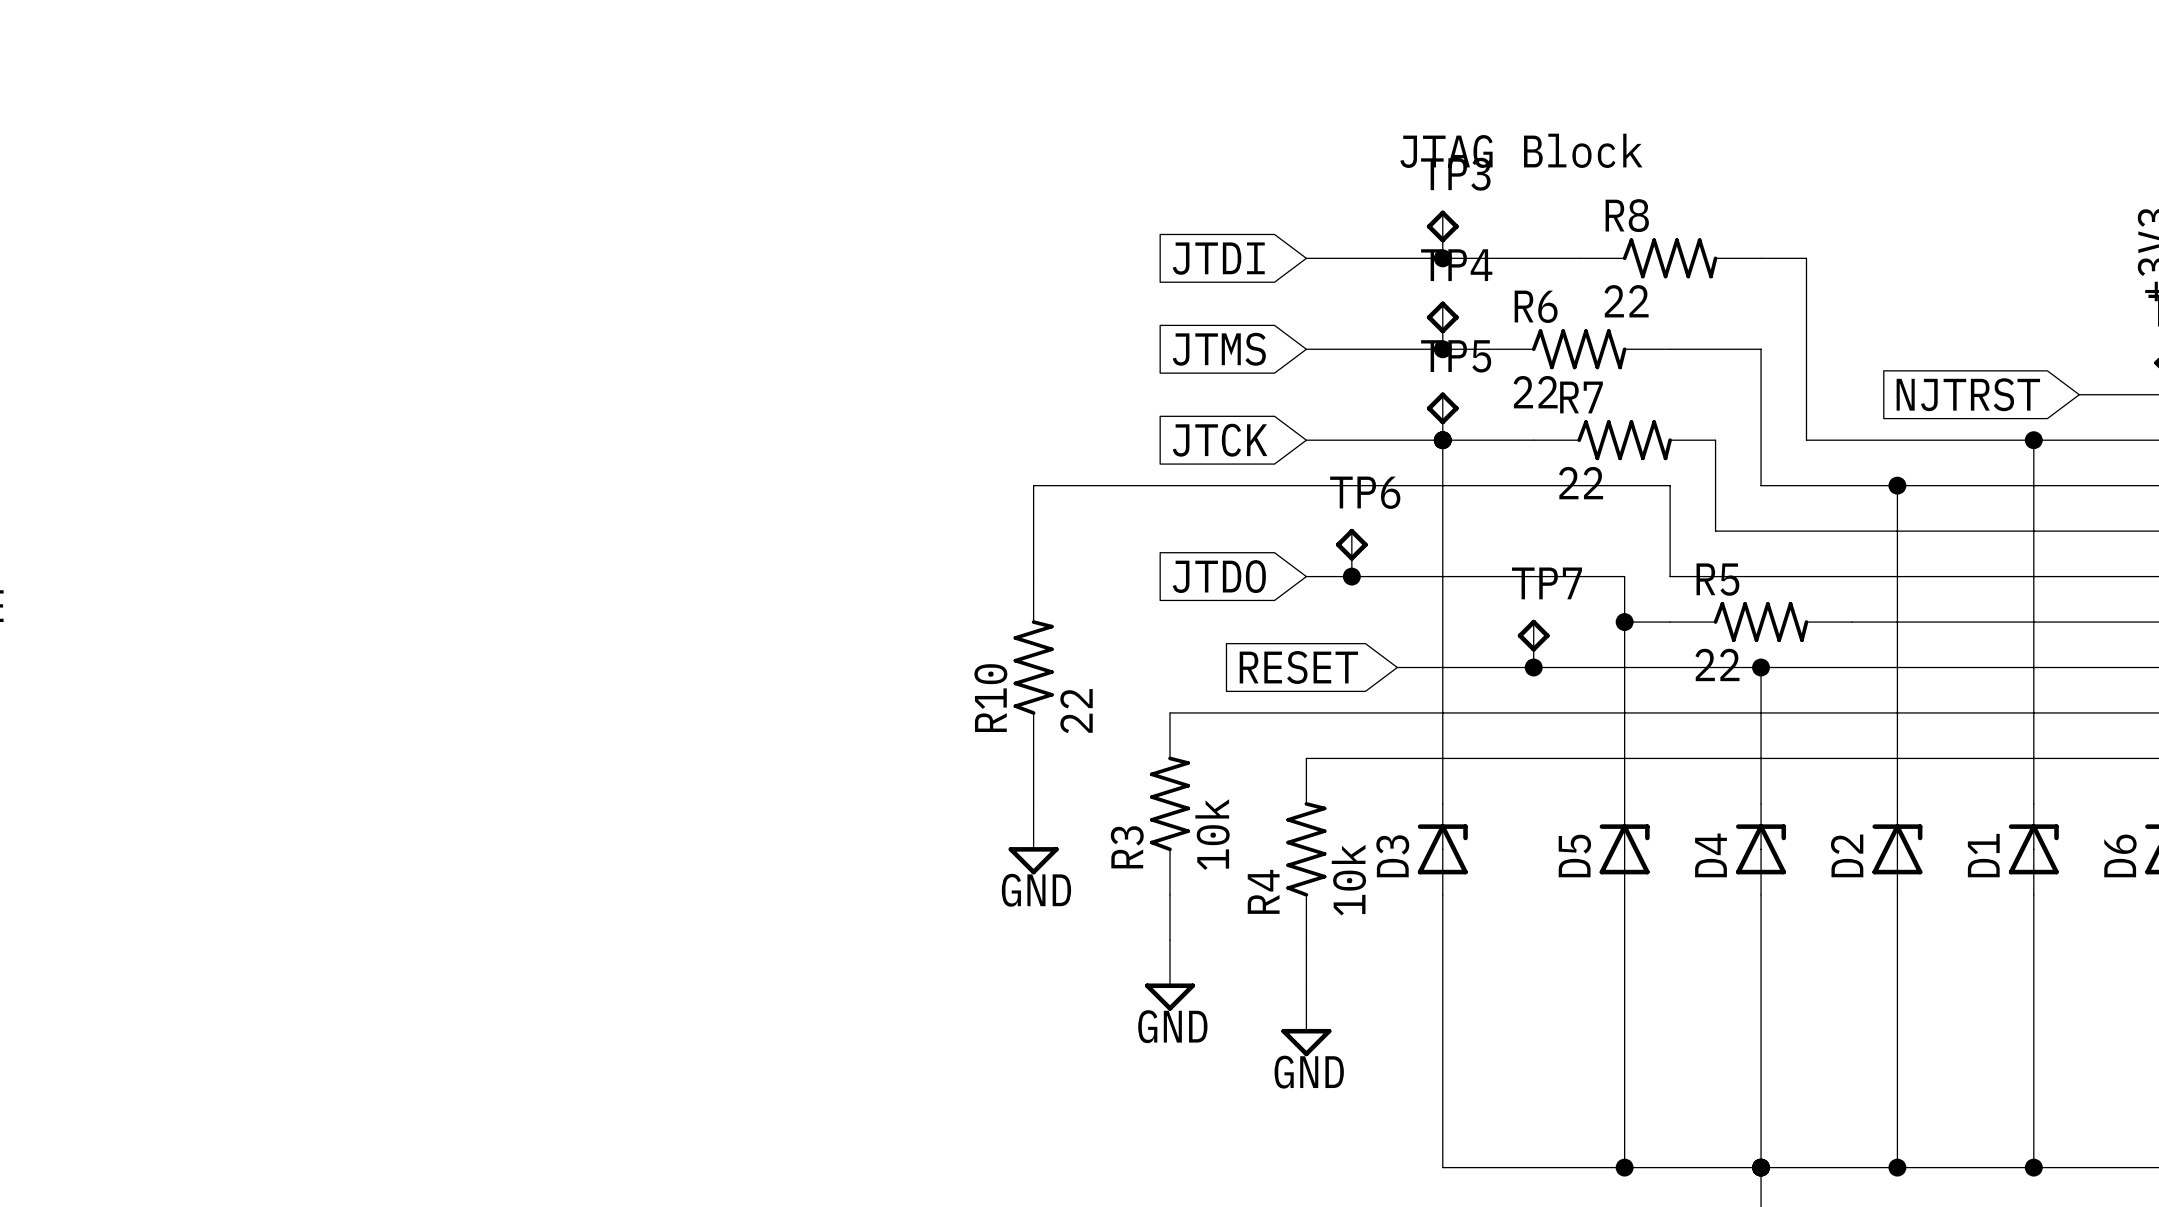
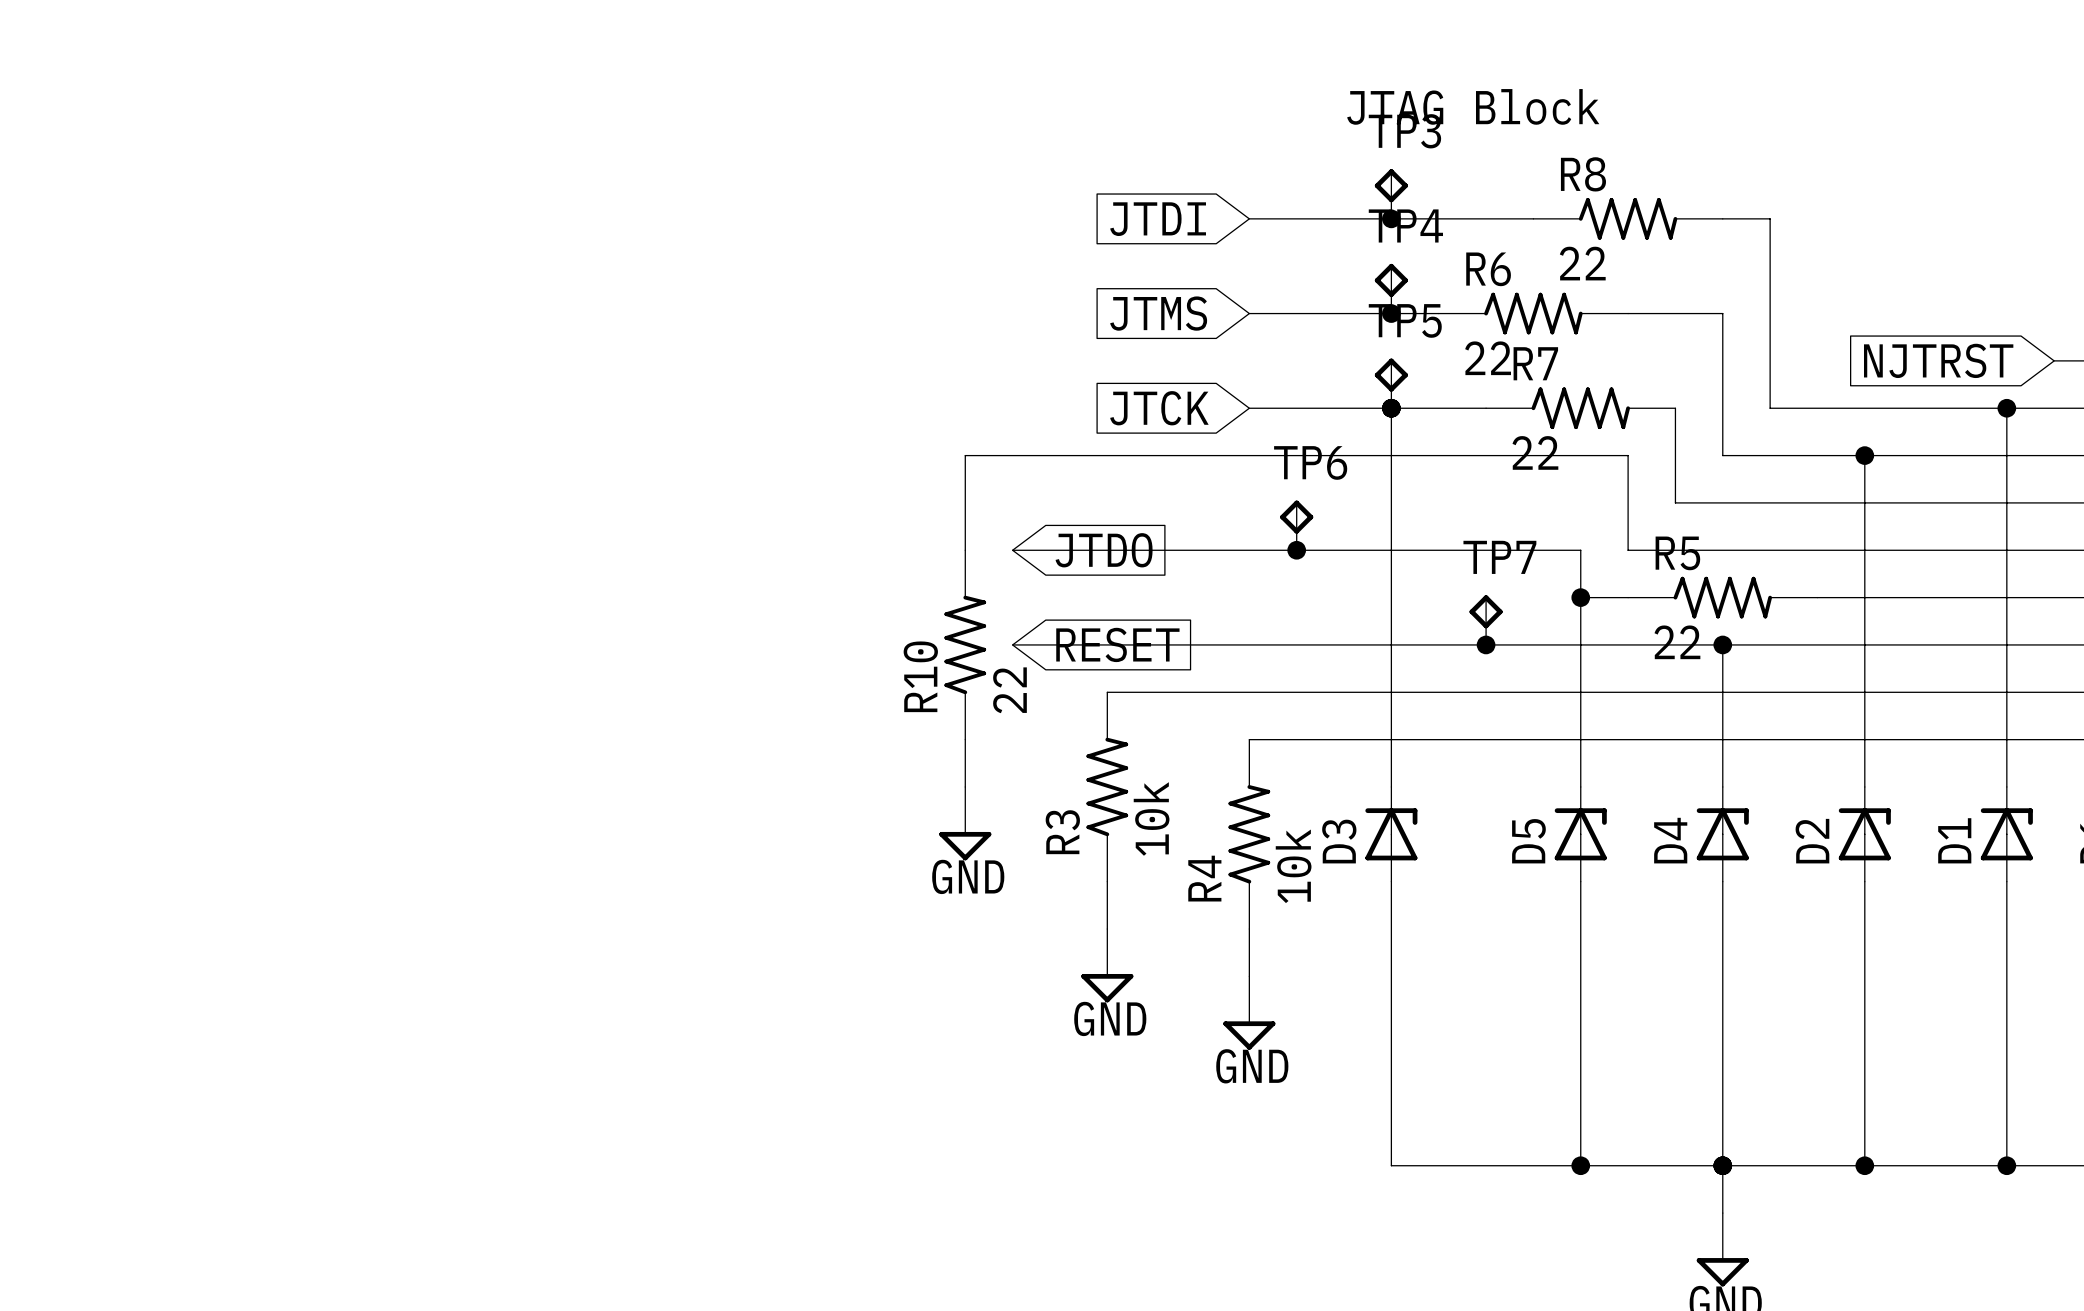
wire: none -> (1012, 550) (1249, 550)
global label rotation: 0° (1219, 576) -> 180° (1104, 550)
wire: none -> (1012, 644) (1344, 644)
global label rotation: 0° (1298, 667) -> 180° (1117, 644)

